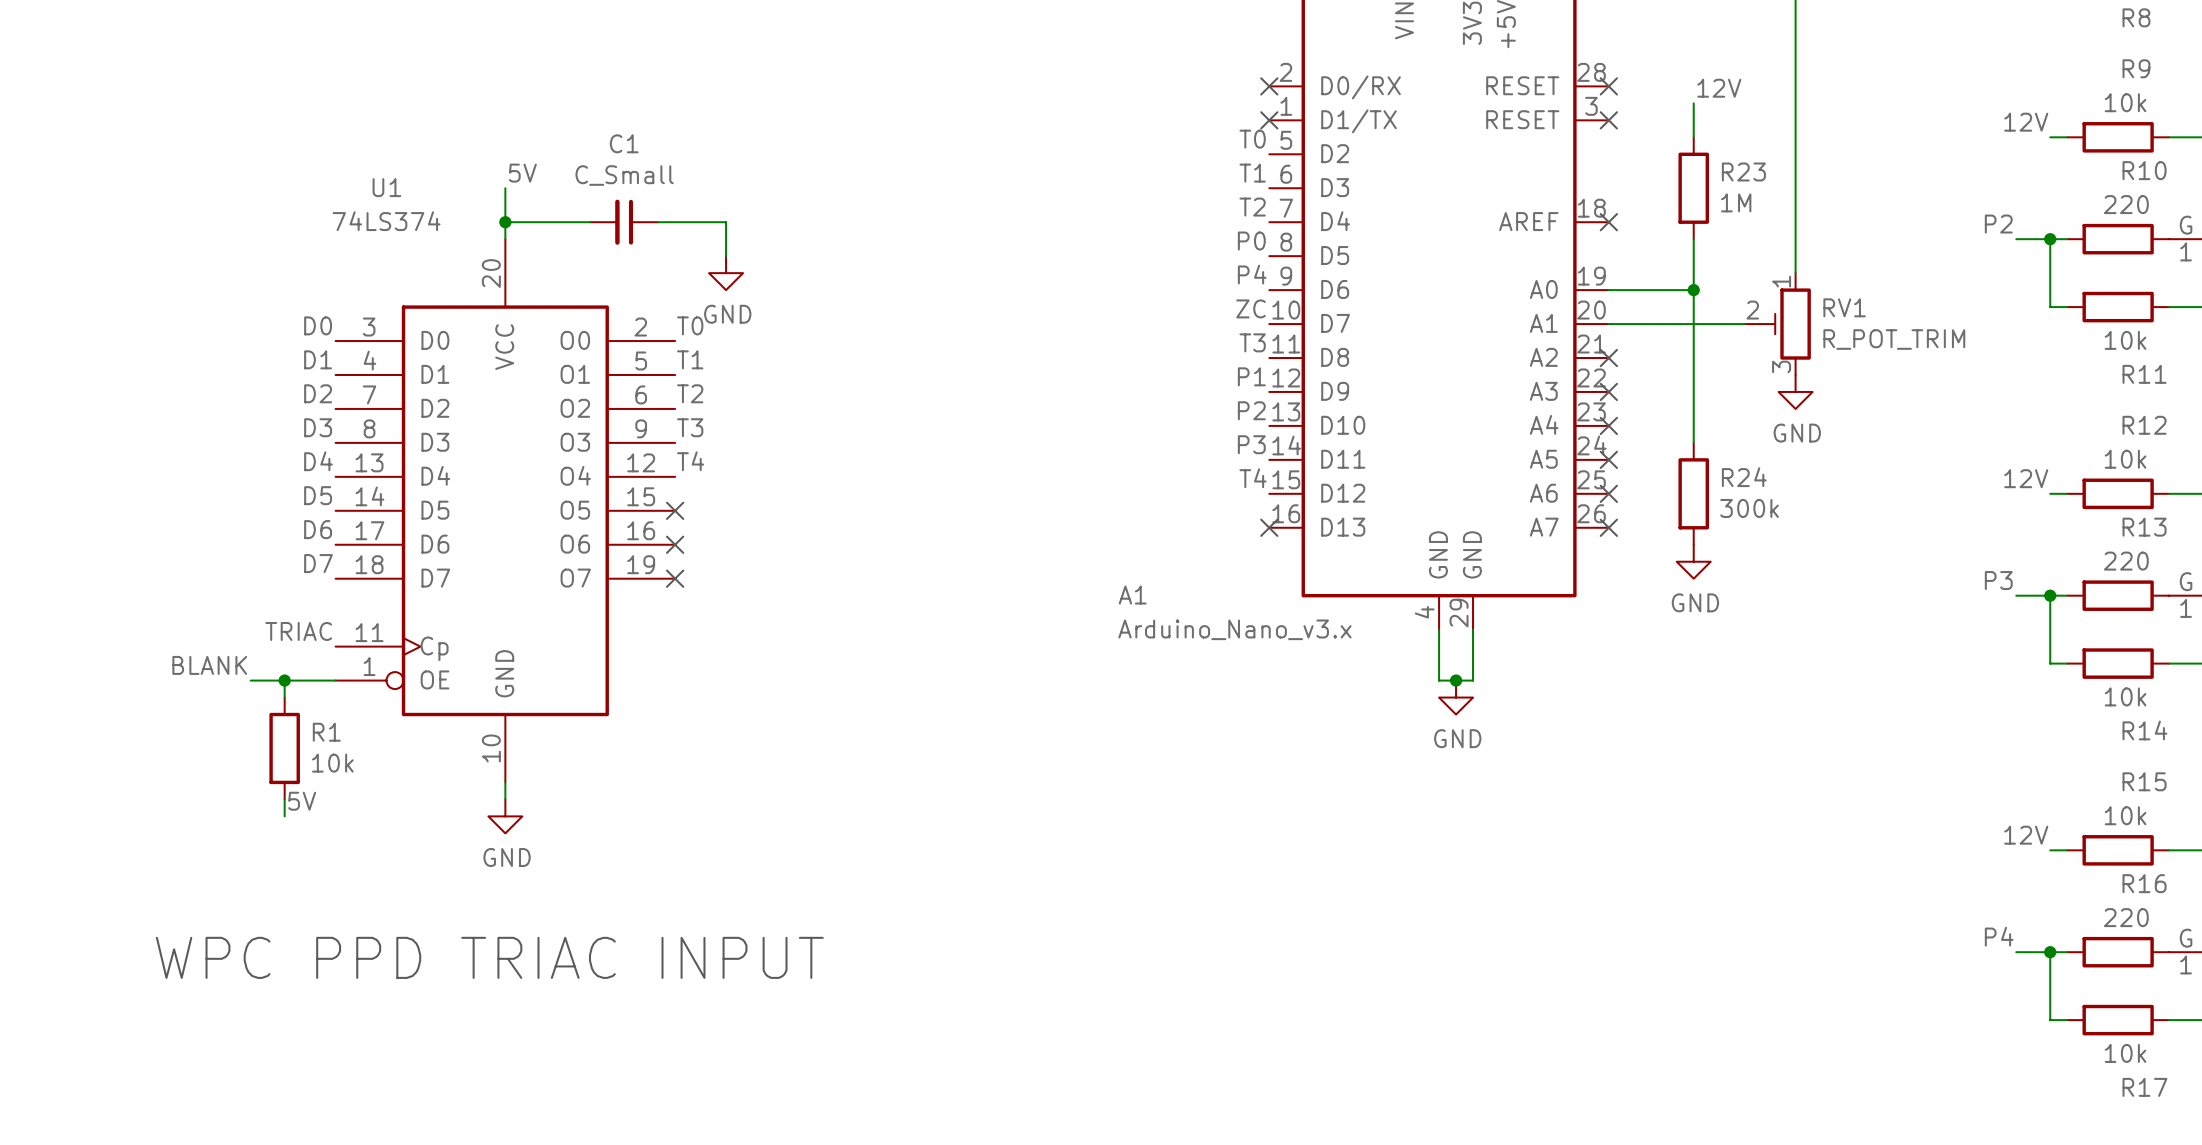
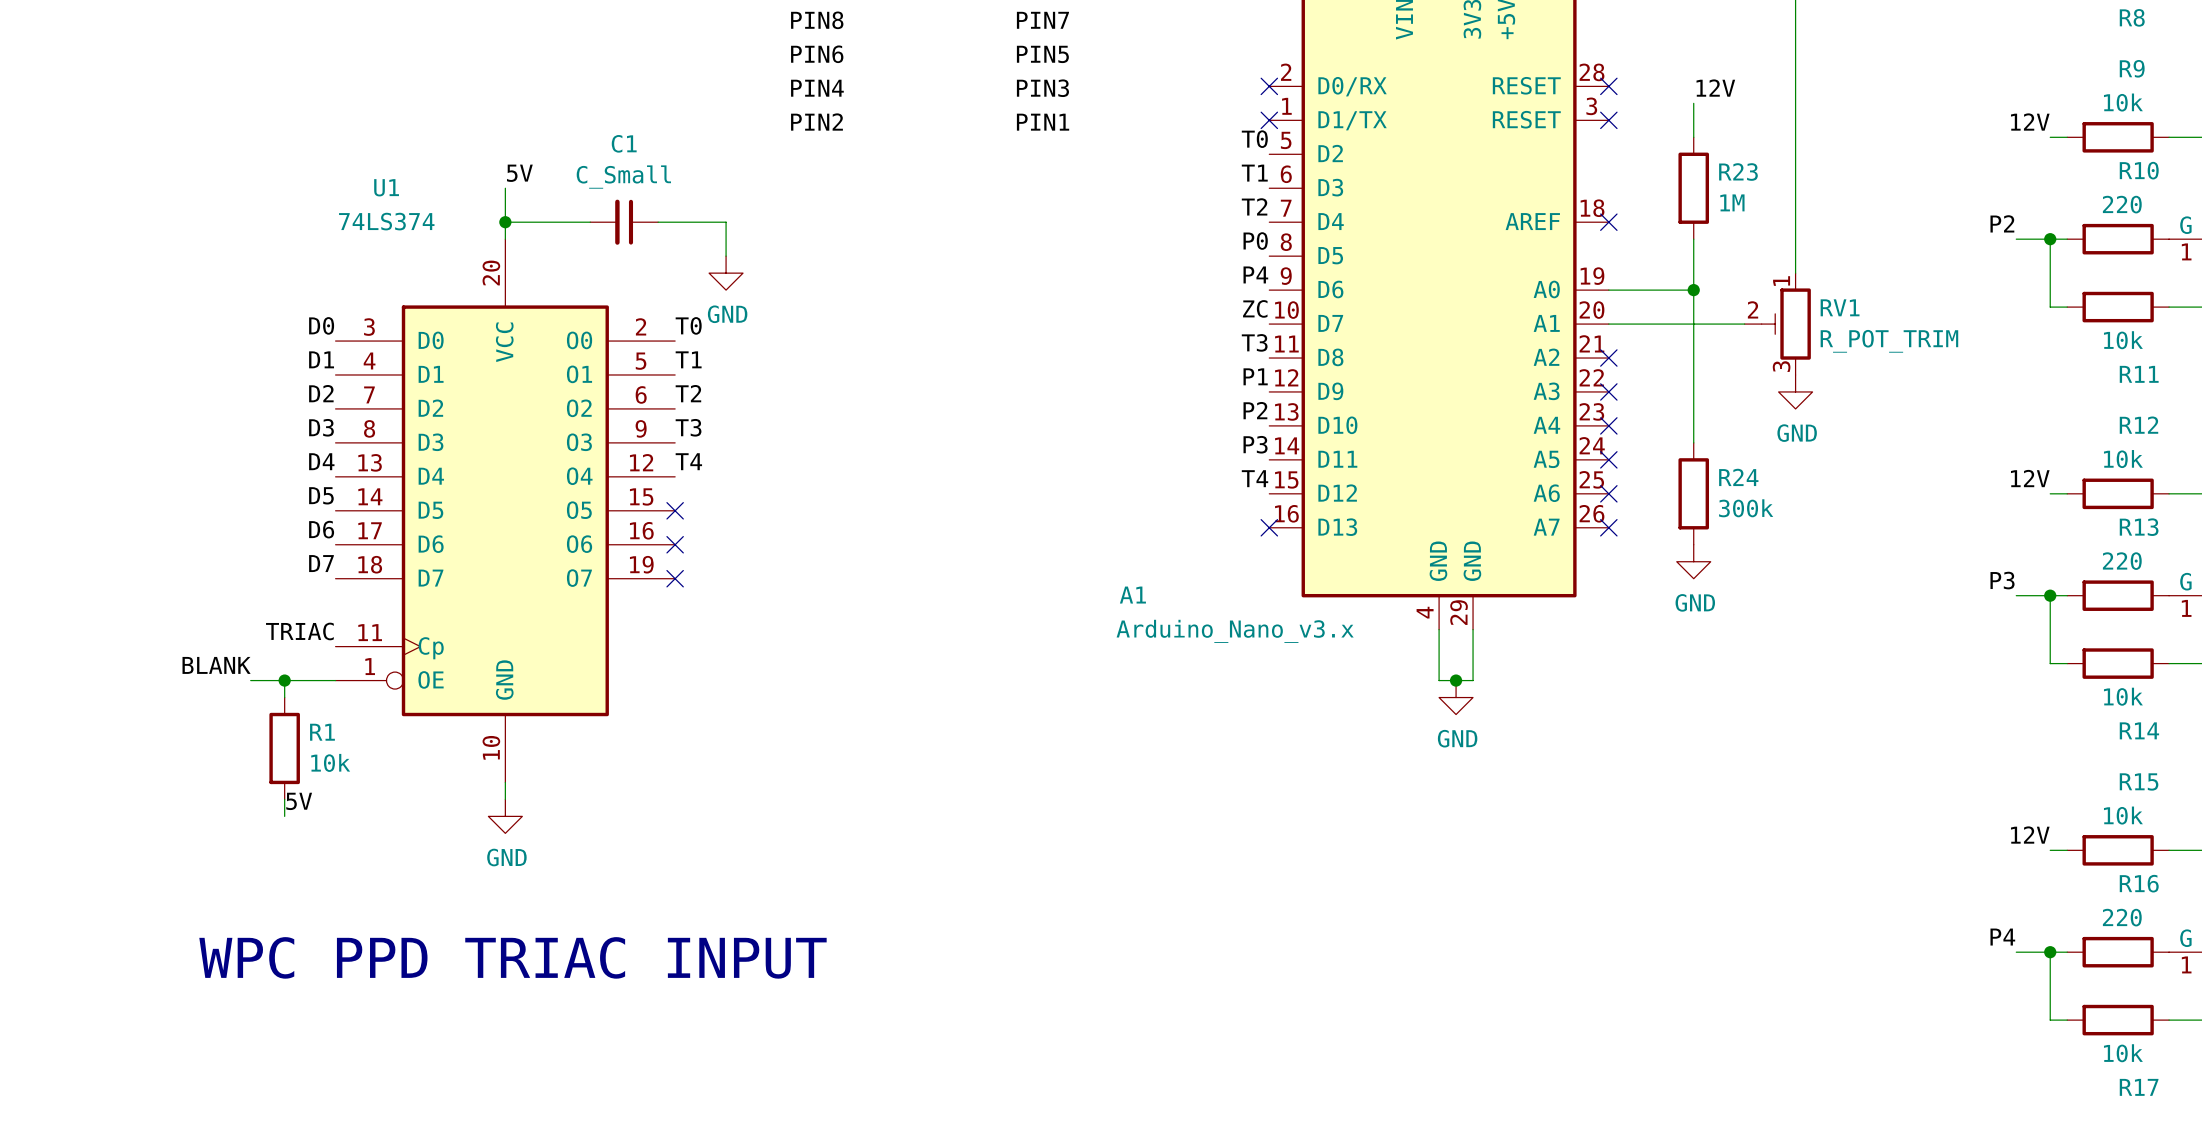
label: none -> PIN8 (817, 20)
label: none -> PIN7 (1042, 20)
label: none -> PIN6 (817, 54)
label: none -> PIN5 (1042, 54)
label: none -> PIN4 (817, 88)
label: none -> PIN3 (1042, 88)
label: none -> PIN2 (816, 122)
label: none -> PIN1 (1043, 122)

